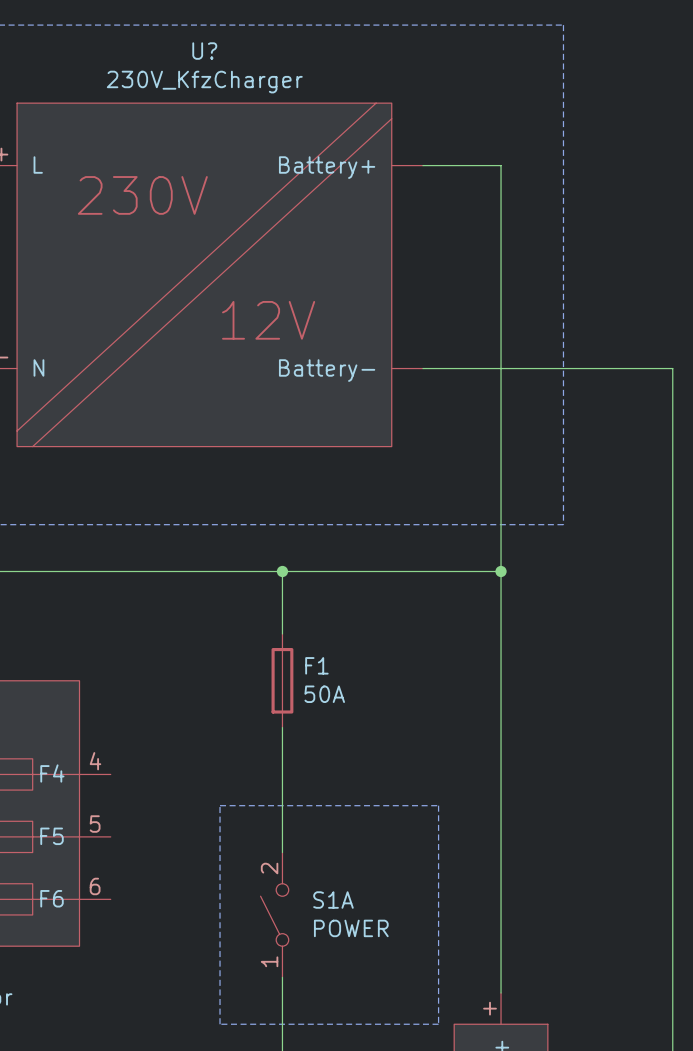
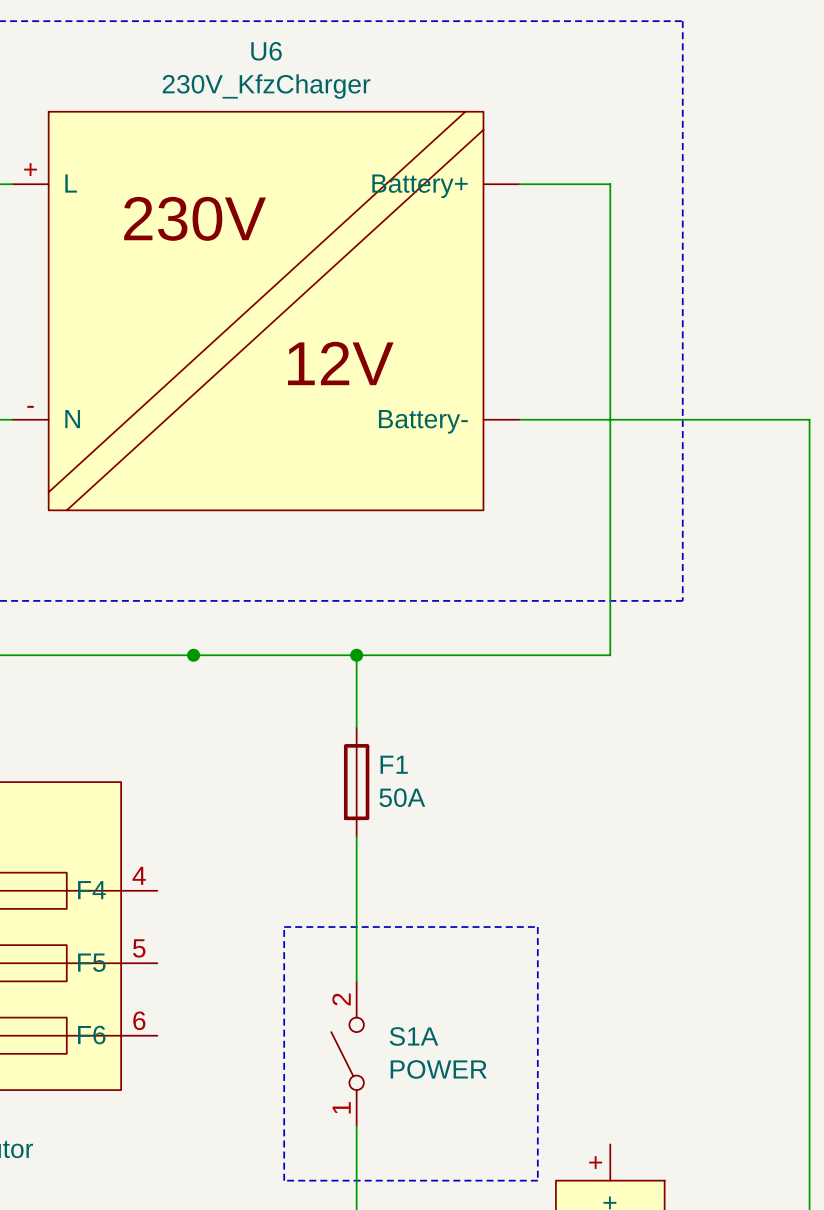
U? name: U? (204, 51) -> U6 (266, 51)
junction: none -> (193, 655)
wire: (501, 571) (501, 993) -> none
junction: (501, 571) -> none

